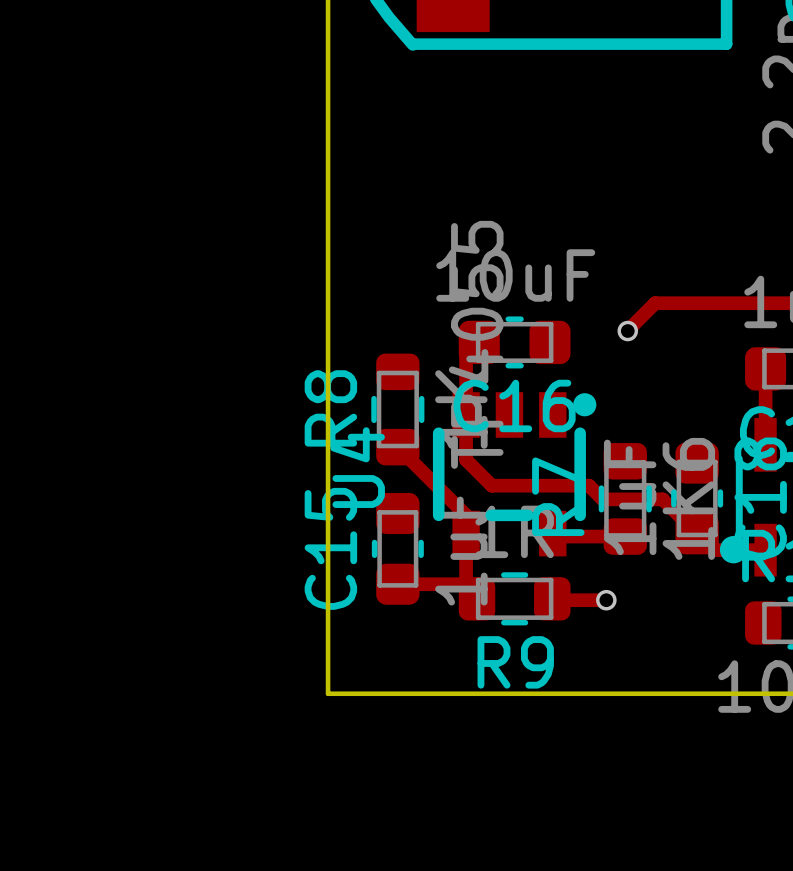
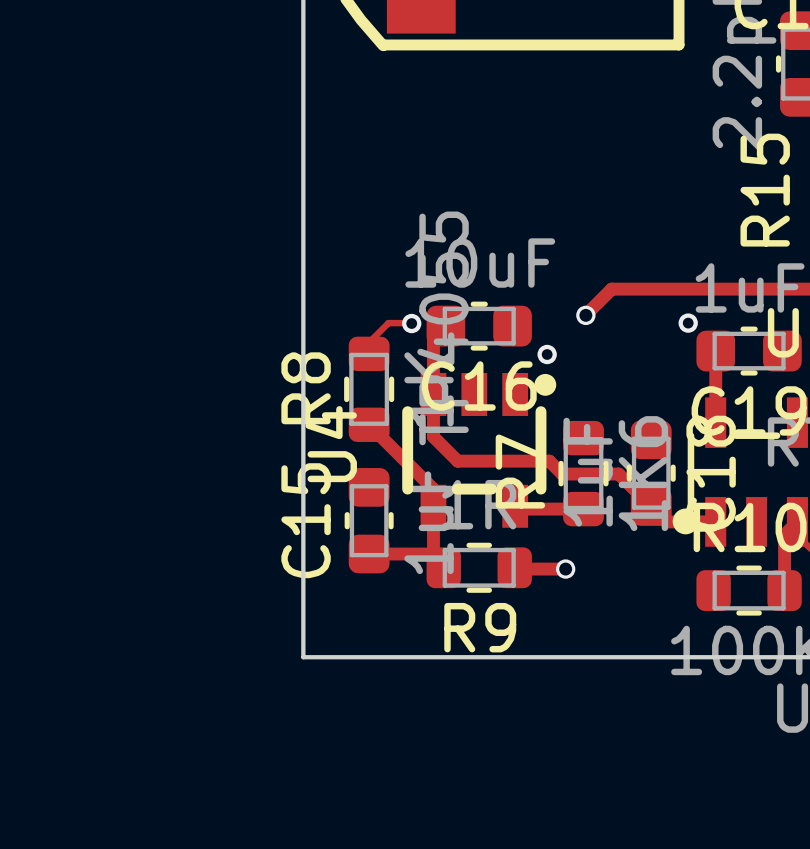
track: none -> (411, 323) (388, 323) (369, 342) (369, 353)
via: none -> (411, 323)
via: none -> (688, 323)
via: none -> (547, 354)

